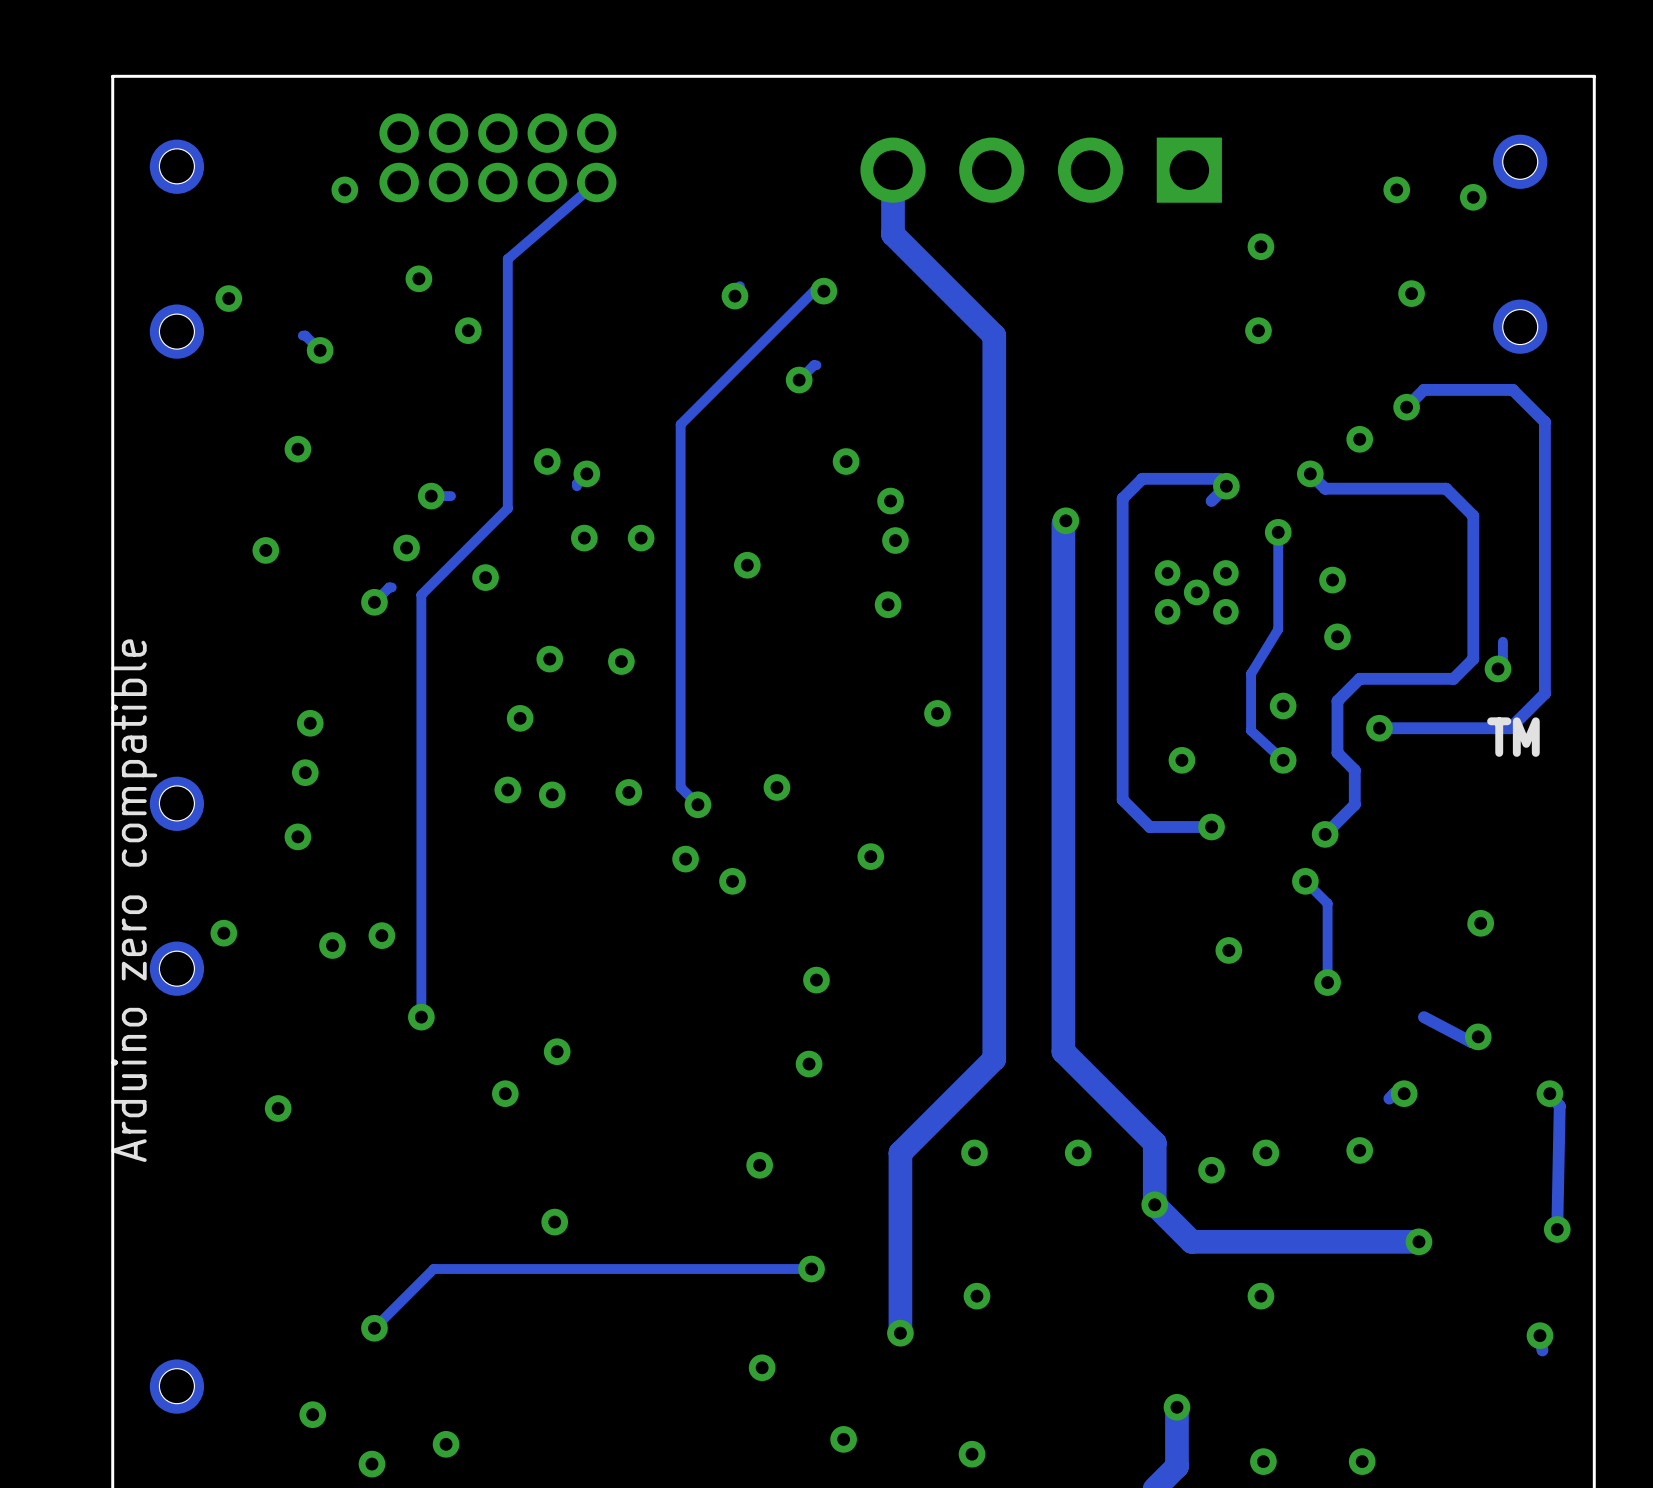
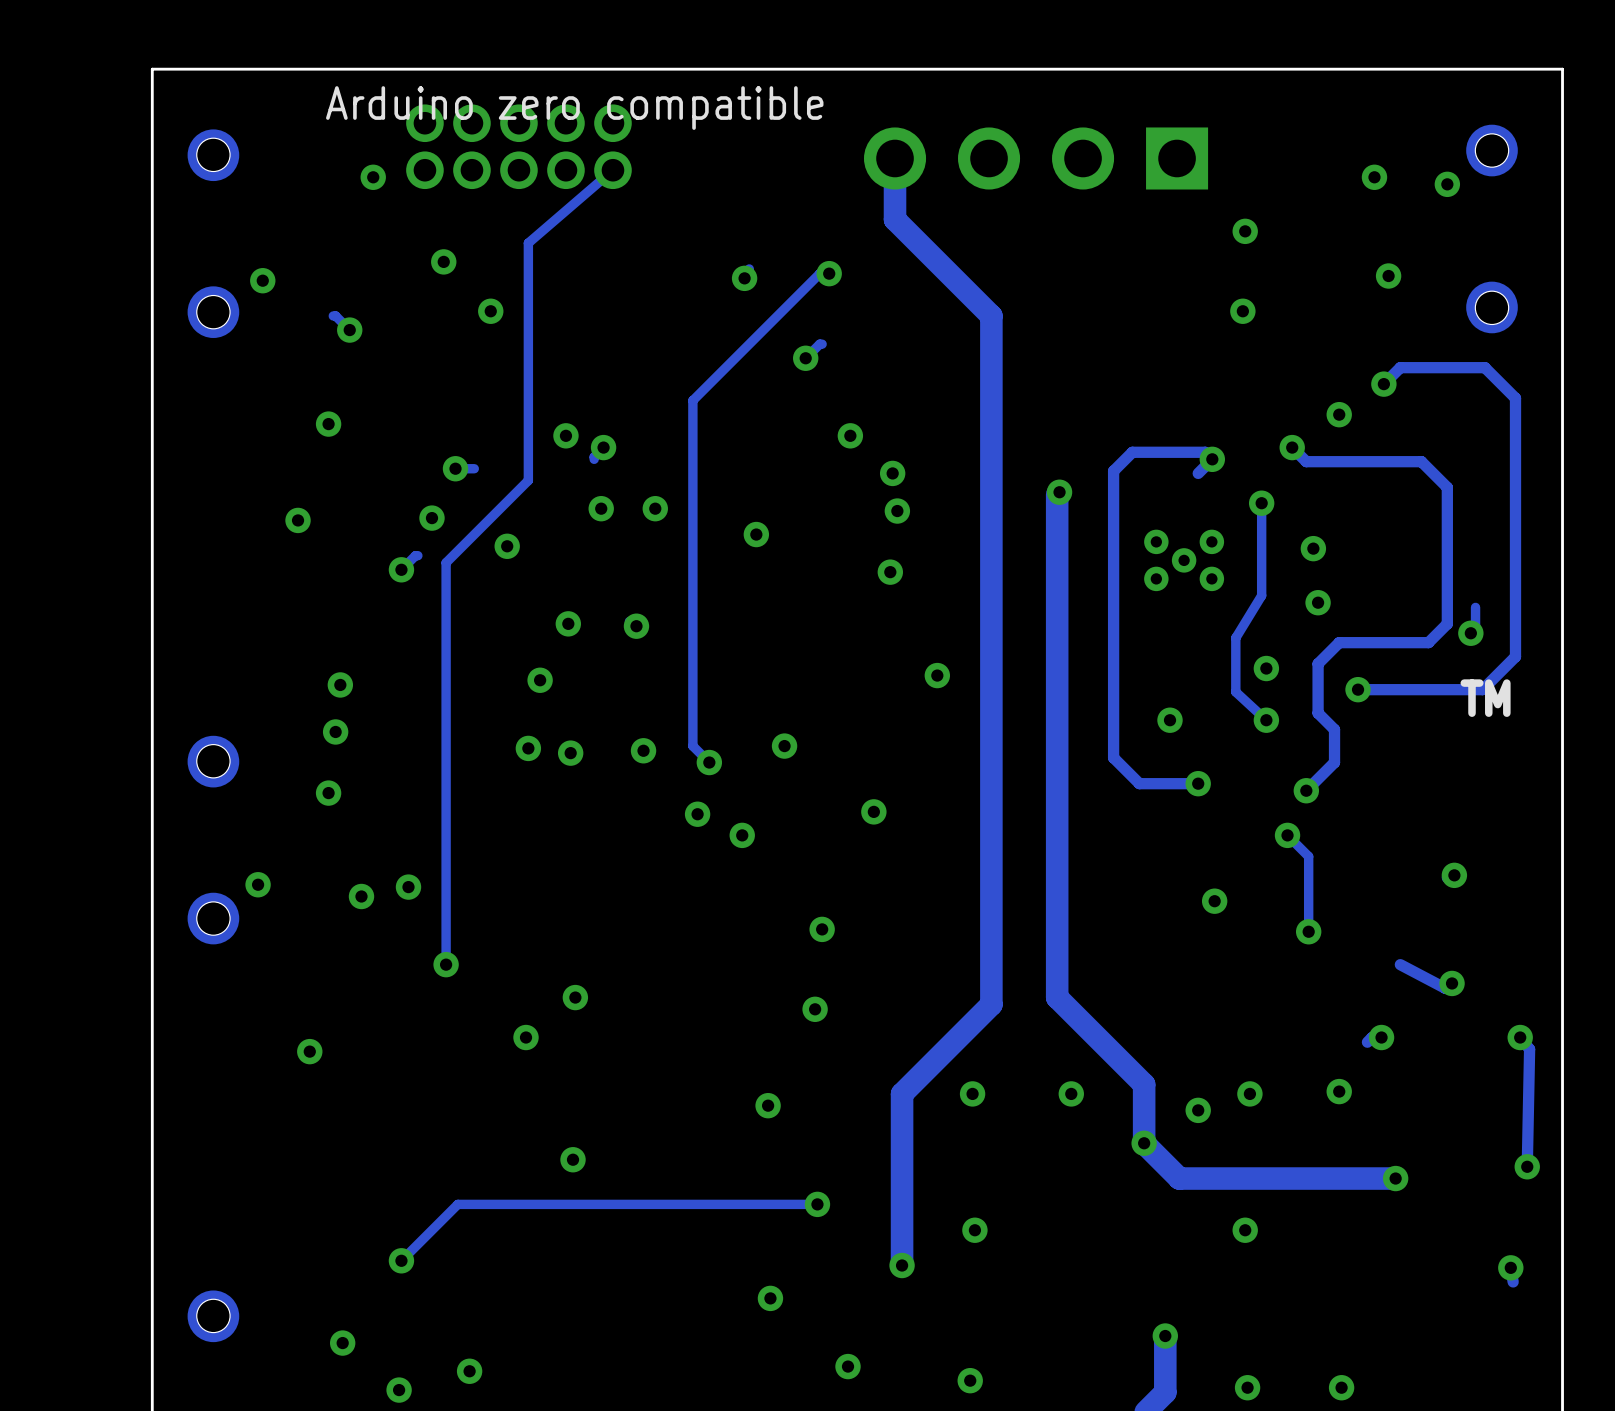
text: none -> Arduino zero compatible (574, 108)
text: Arduino zero compatible (134, 900) -> none

